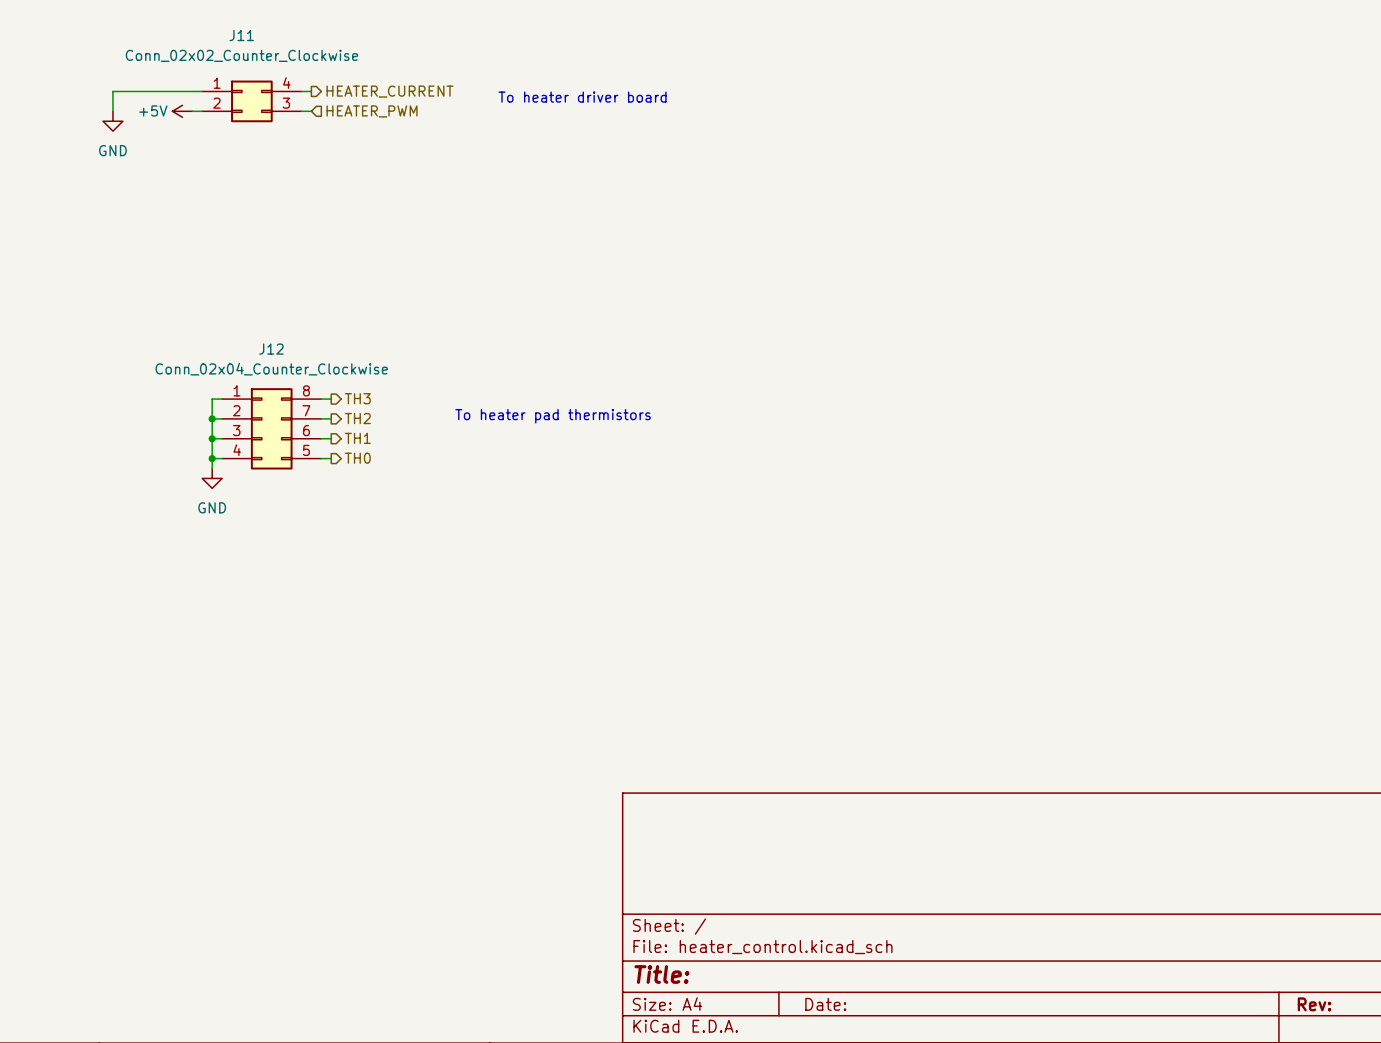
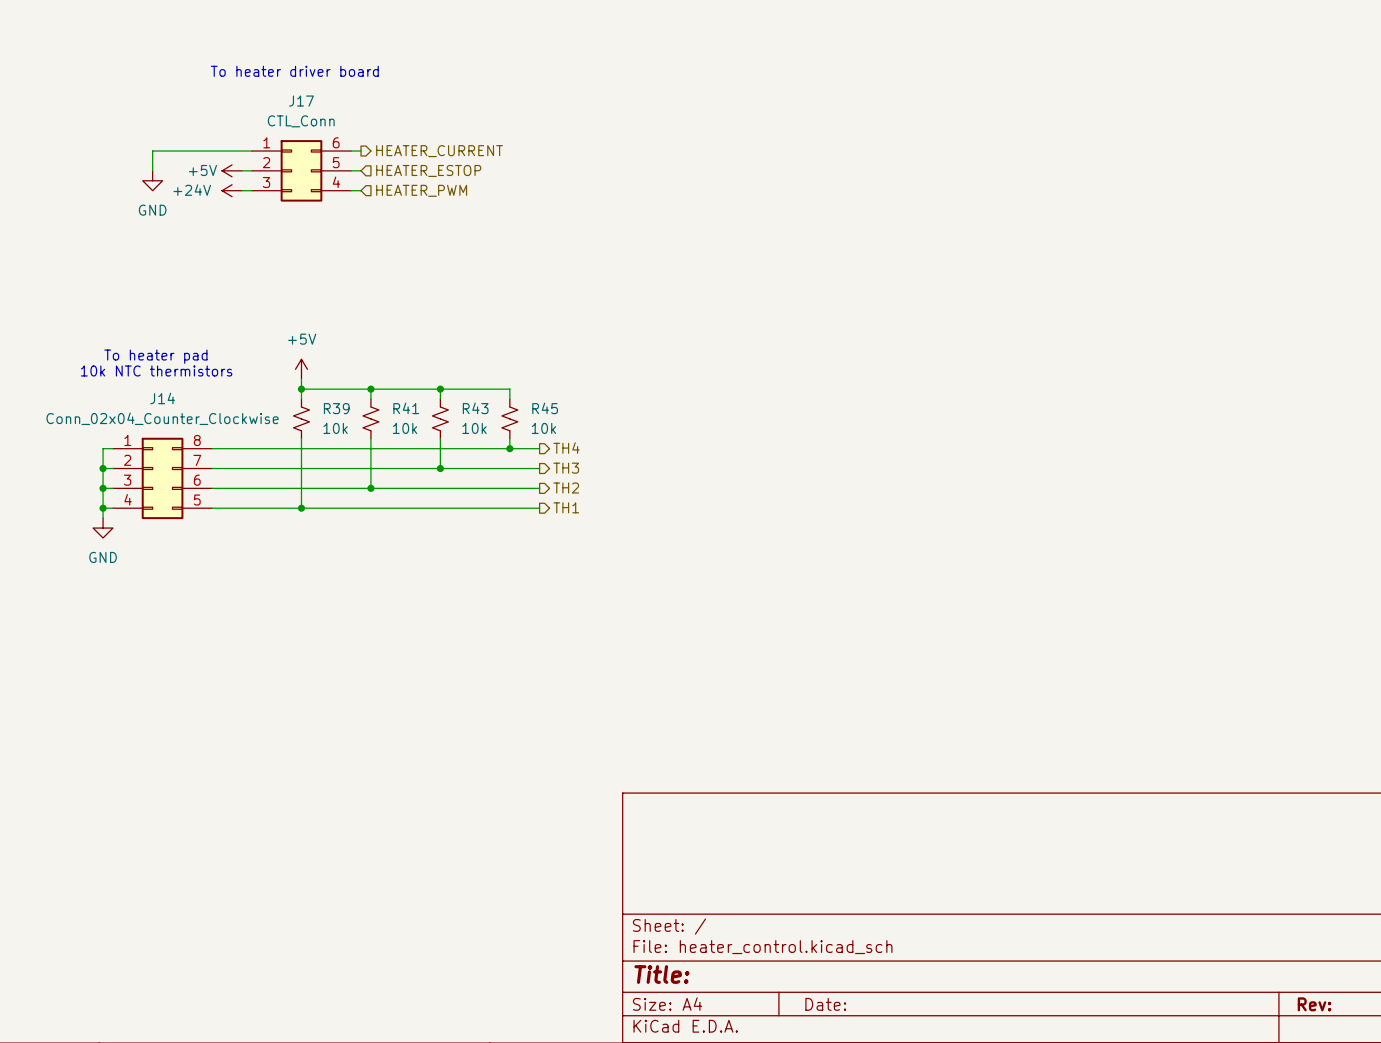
text: none -> To heater driver board (294, 71)
wire: (202, 91) (112, 91) (112, 111) -> none
wire: (301, 91) (311, 91) -> (351, 151) (361, 151)
hierarchical label position: HEATER_CURRENT (389, 91) -> HEATER_CURRENT (439, 151)
text: To heater driver board (582, 97) -> none
J11: Conn_02x02_Counter_Clockwise (251, 101) -> none
power symbol position: +5V (182, 111) -> +5V (232, 170)
wire: (192, 111) (202, 111) -> (241, 170) (251, 170)
wire: (301, 111) (311, 111) -> (351, 170) (361, 170)
hierarchical label position: HEATER_PWM (372, 111) -> HEATER_PWM (421, 190)
power symbol position: GND (112, 121) -> GND (152, 180)
wire: none -> (251, 151) (152, 151) (152, 170)
J17: none -> CTL_Conn (301, 170)
hierarchical label: none -> HEATER_ESTOP (428, 170)
power symbol: none -> +24V (232, 190)
wire: none -> (241, 190) (251, 190)
wire: none -> (351, 190) (361, 190)
text: none -> To heater pad (155, 356)
power symbol: none -> +5V (301, 369)
text: none -> 10k NTC thermistors (156, 370)
wire: none -> (301, 379) (301, 399)
wire: none -> (301, 389) (509, 389) (509, 399)
junction: none -> (301, 389)
wire: none -> (370, 389) (370, 399)
junction: none -> (370, 389)
wire: none -> (440, 389) (440, 399)
junction: none -> (440, 389)
hierarchical label: TH3 (357, 398) -> none
wire: (222, 399) (212, 399) (212, 468) -> (539, 468) (212, 468)
wire: (321, 399) (331, 399) -> none
text: To heater pad thermistors (553, 416) -> none
wire: (212, 418) (222, 418) -> (103, 468) (112, 468)
junction: (212, 418) -> none
R39: none -> 10k (301, 418)
wire: (321, 418) (331, 418) -> none
hierarchical label: TH2 (357, 418) -> none
R41: none -> 10k (370, 418)
R43: none -> 10k (440, 418)
R45: none -> 10k (509, 418)
J12: Conn_02x04_Counter_Clockwise (271, 428) -> none
wire: (212, 438) (222, 438) -> (103, 488) (112, 488)
junction: (212, 438) -> none
wire: none -> (301, 438) (301, 508)
wire: (321, 438) (331, 438) -> none
hierarchical label: TH1 (357, 438) -> none
wire: none -> (370, 438) (370, 488)
wire: none -> (440, 438) (440, 468)
wire: none -> (509, 438) (509, 448)
wire: none -> (112, 448) (103, 448) (103, 518)
wire: none -> (212, 448) (539, 448)
junction: none -> (509, 448)
hierarchical label: none -> TH4 (566, 448)
wire: (212, 458) (222, 458) -> (103, 508) (112, 508)
junction: (212, 458) -> none
wire: (321, 458) (331, 458) -> none
hierarchical label: TH0 (357, 458) -> none
junction: none -> (103, 468)
junction: none -> (440, 468)
hierarchical label: none -> TH3 (566, 468)
J14: none -> Conn_02x04_Counter_Clockwise (162, 478)
power symbol position: GND (212, 478) -> GND (103, 528)
hierarchical label: none -> TH2 (566, 487)
junction: none -> (103, 488)
wire: none -> (212, 488) (539, 488)
junction: none -> (370, 488)
hierarchical label: none -> TH1 (566, 507)
junction: none -> (103, 508)
wire: none -> (212, 508) (539, 508)
junction: none -> (301, 508)

